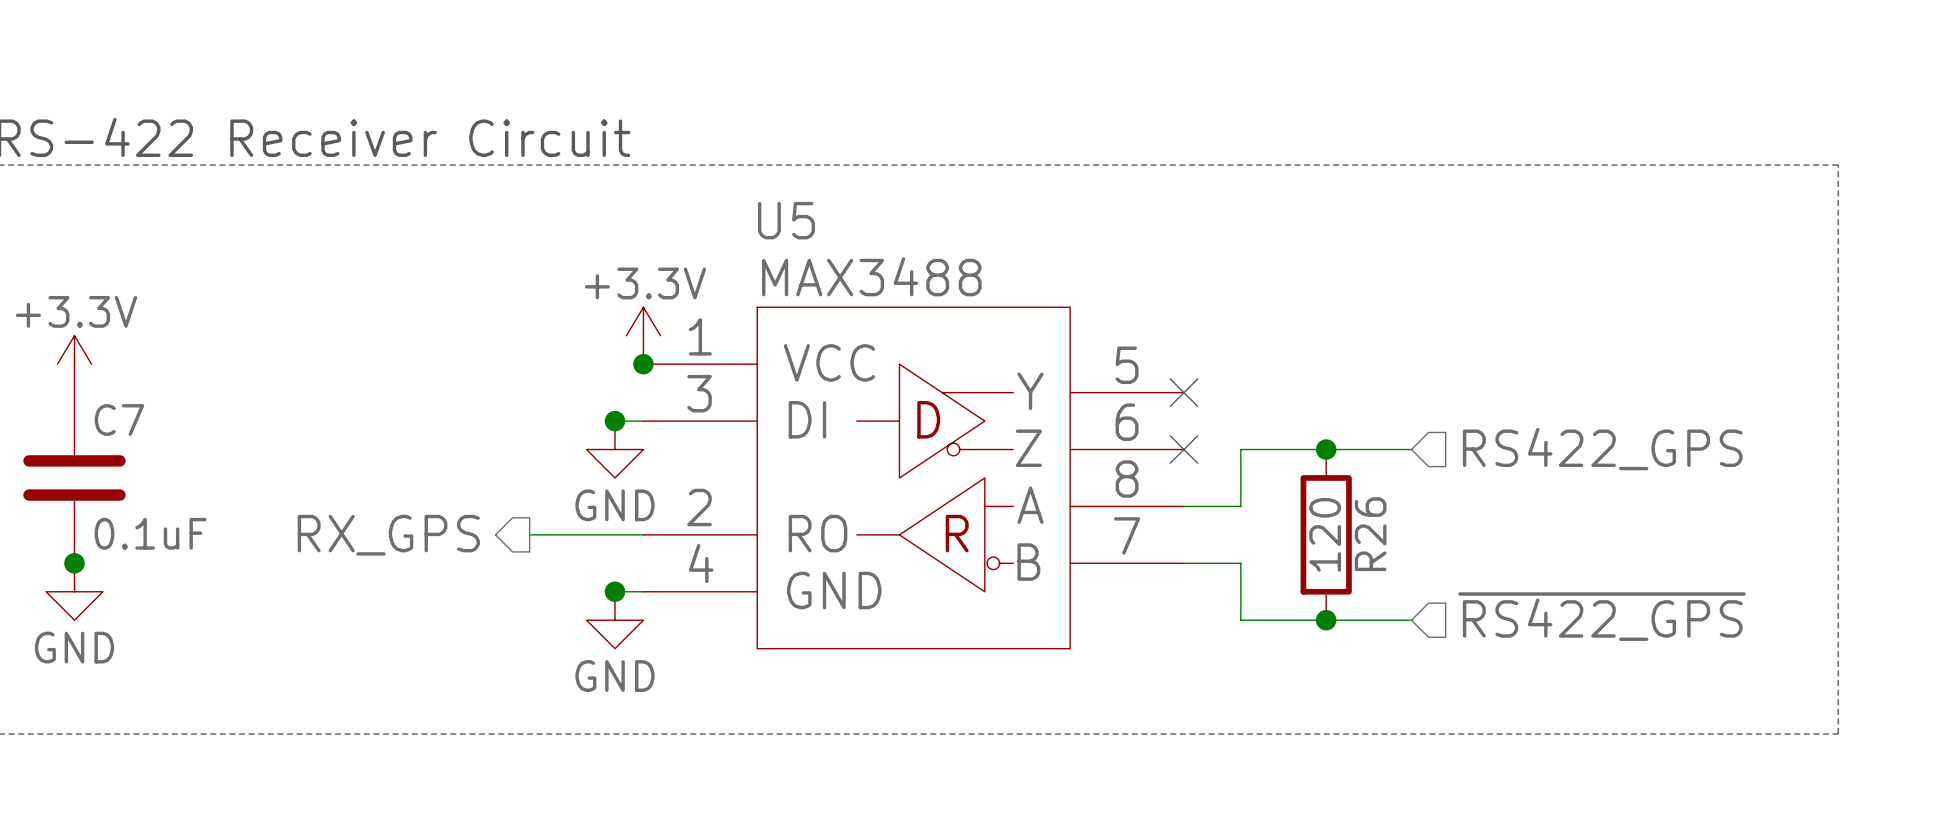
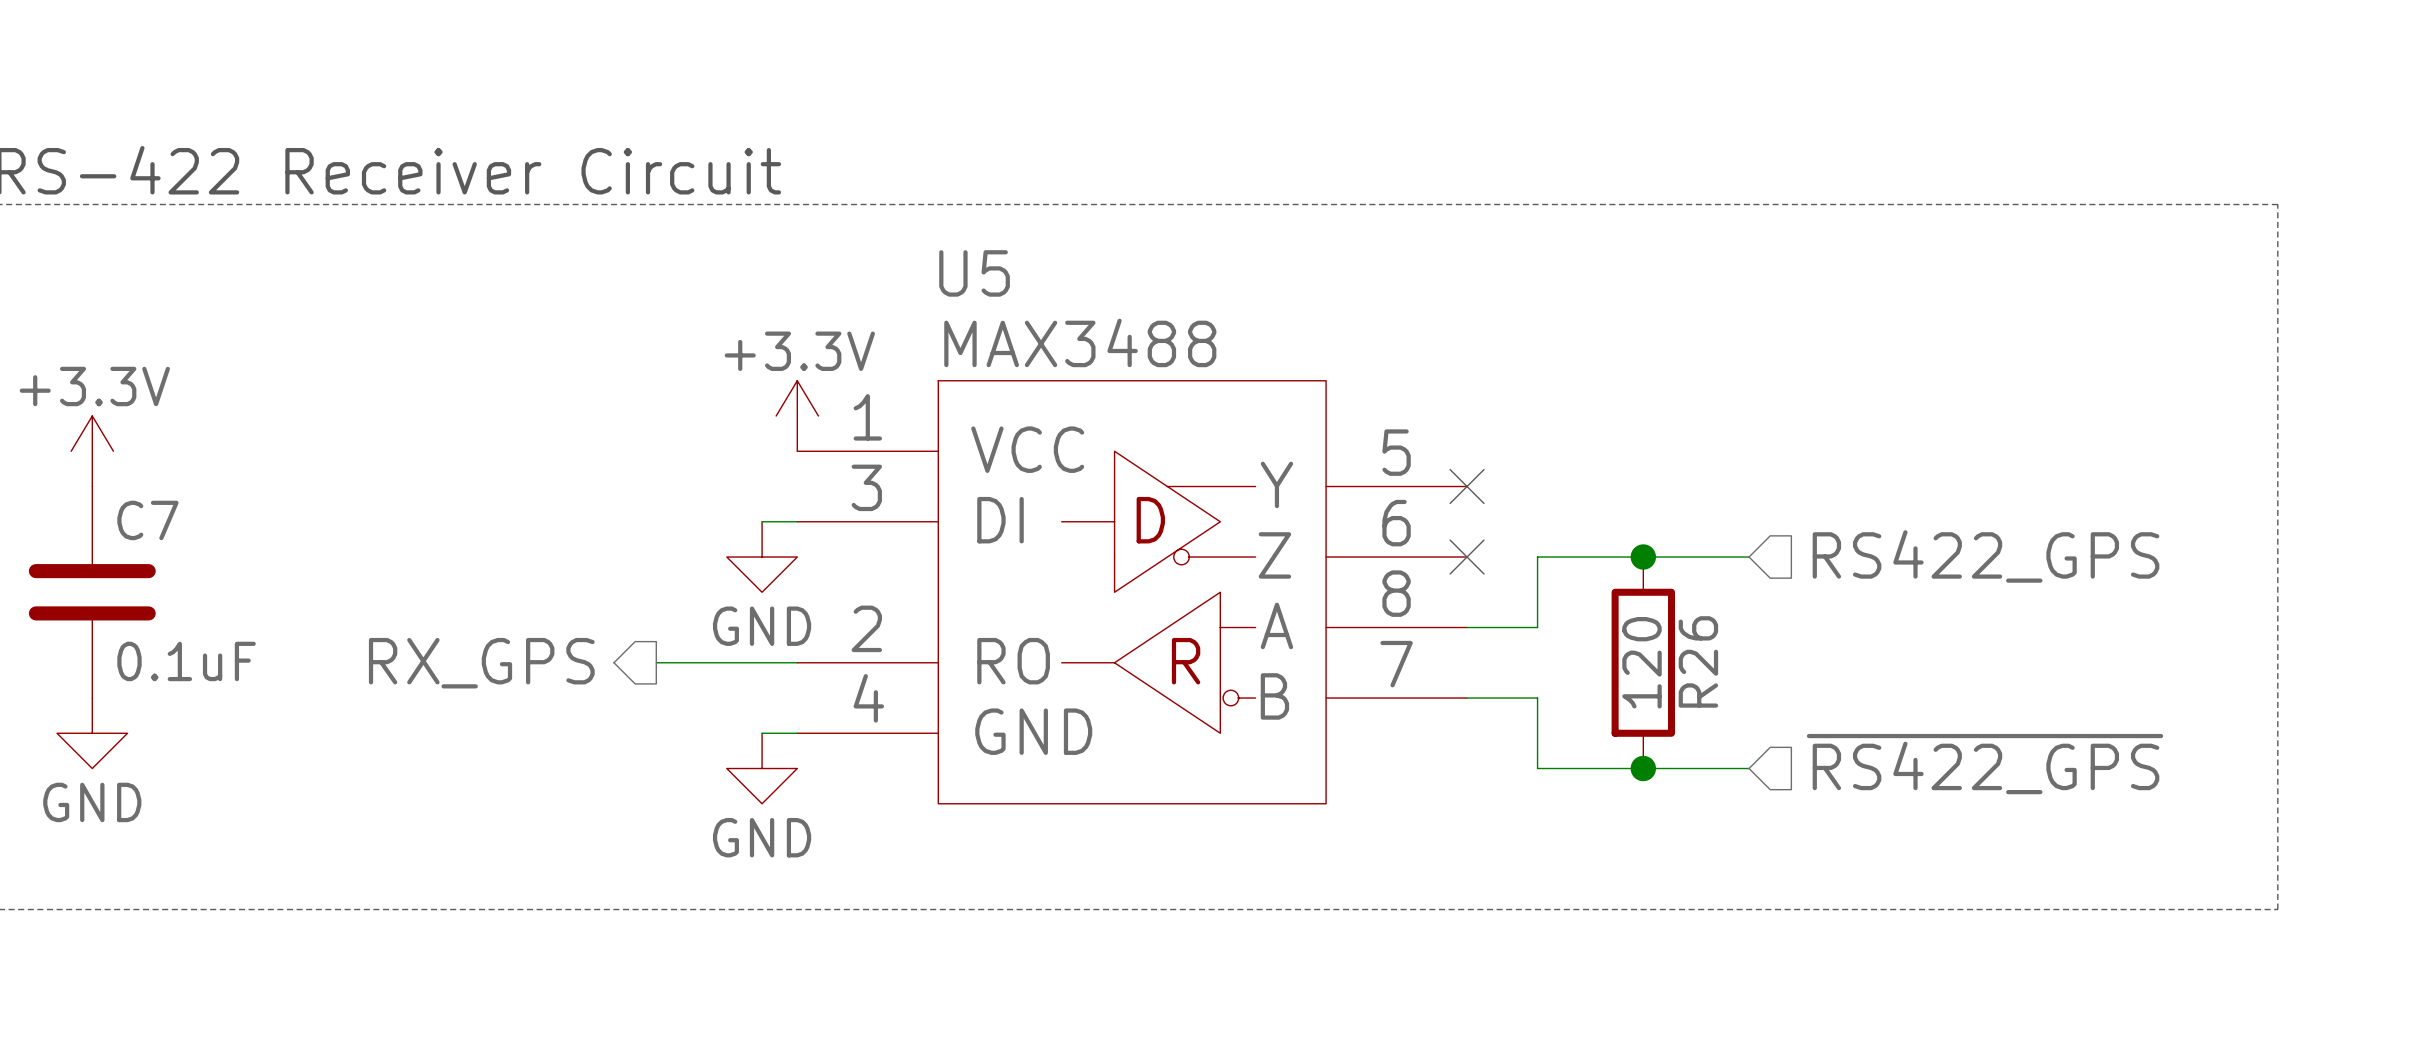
junction: (643, 364) -> none
junction: (615, 421) -> none
junction: (74, 563) -> none
junction: (615, 591) -> none

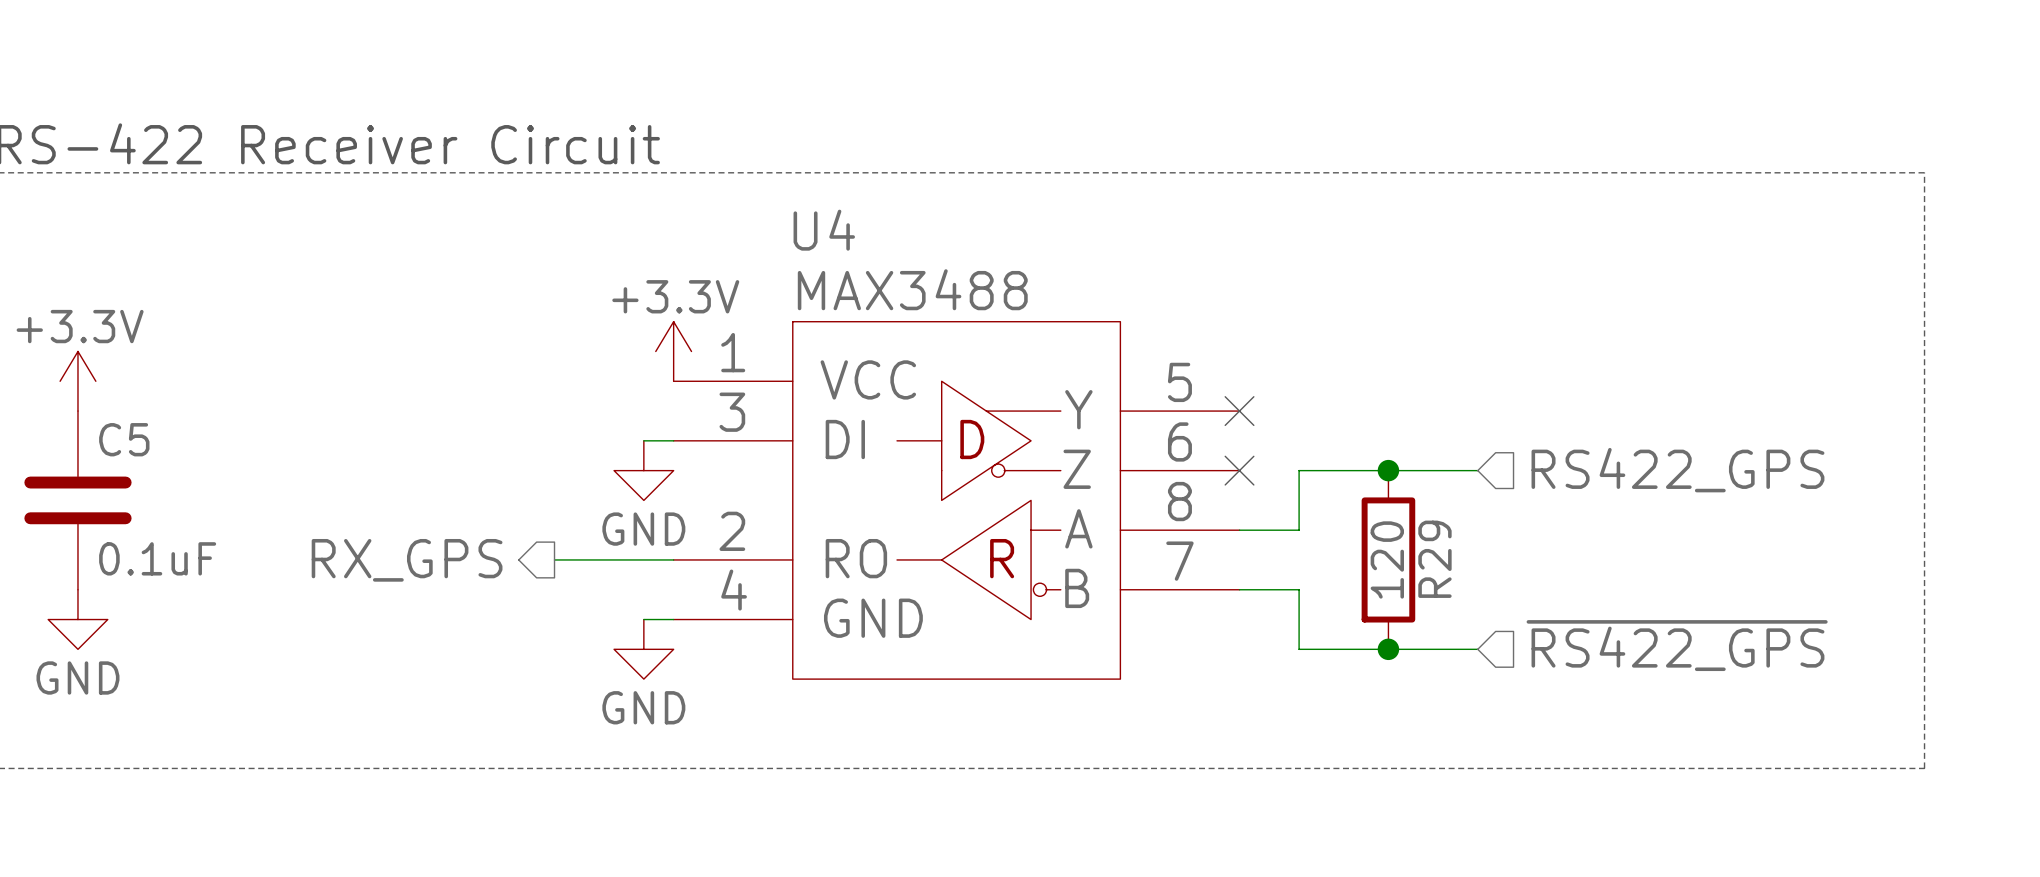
U5 name: U5 (974, 273) -> U4 (824, 230)
C7 name: C7 (147, 520) -> C5 (124, 439)
R26 name: R26 (1698, 661) -> R29 (1434, 559)

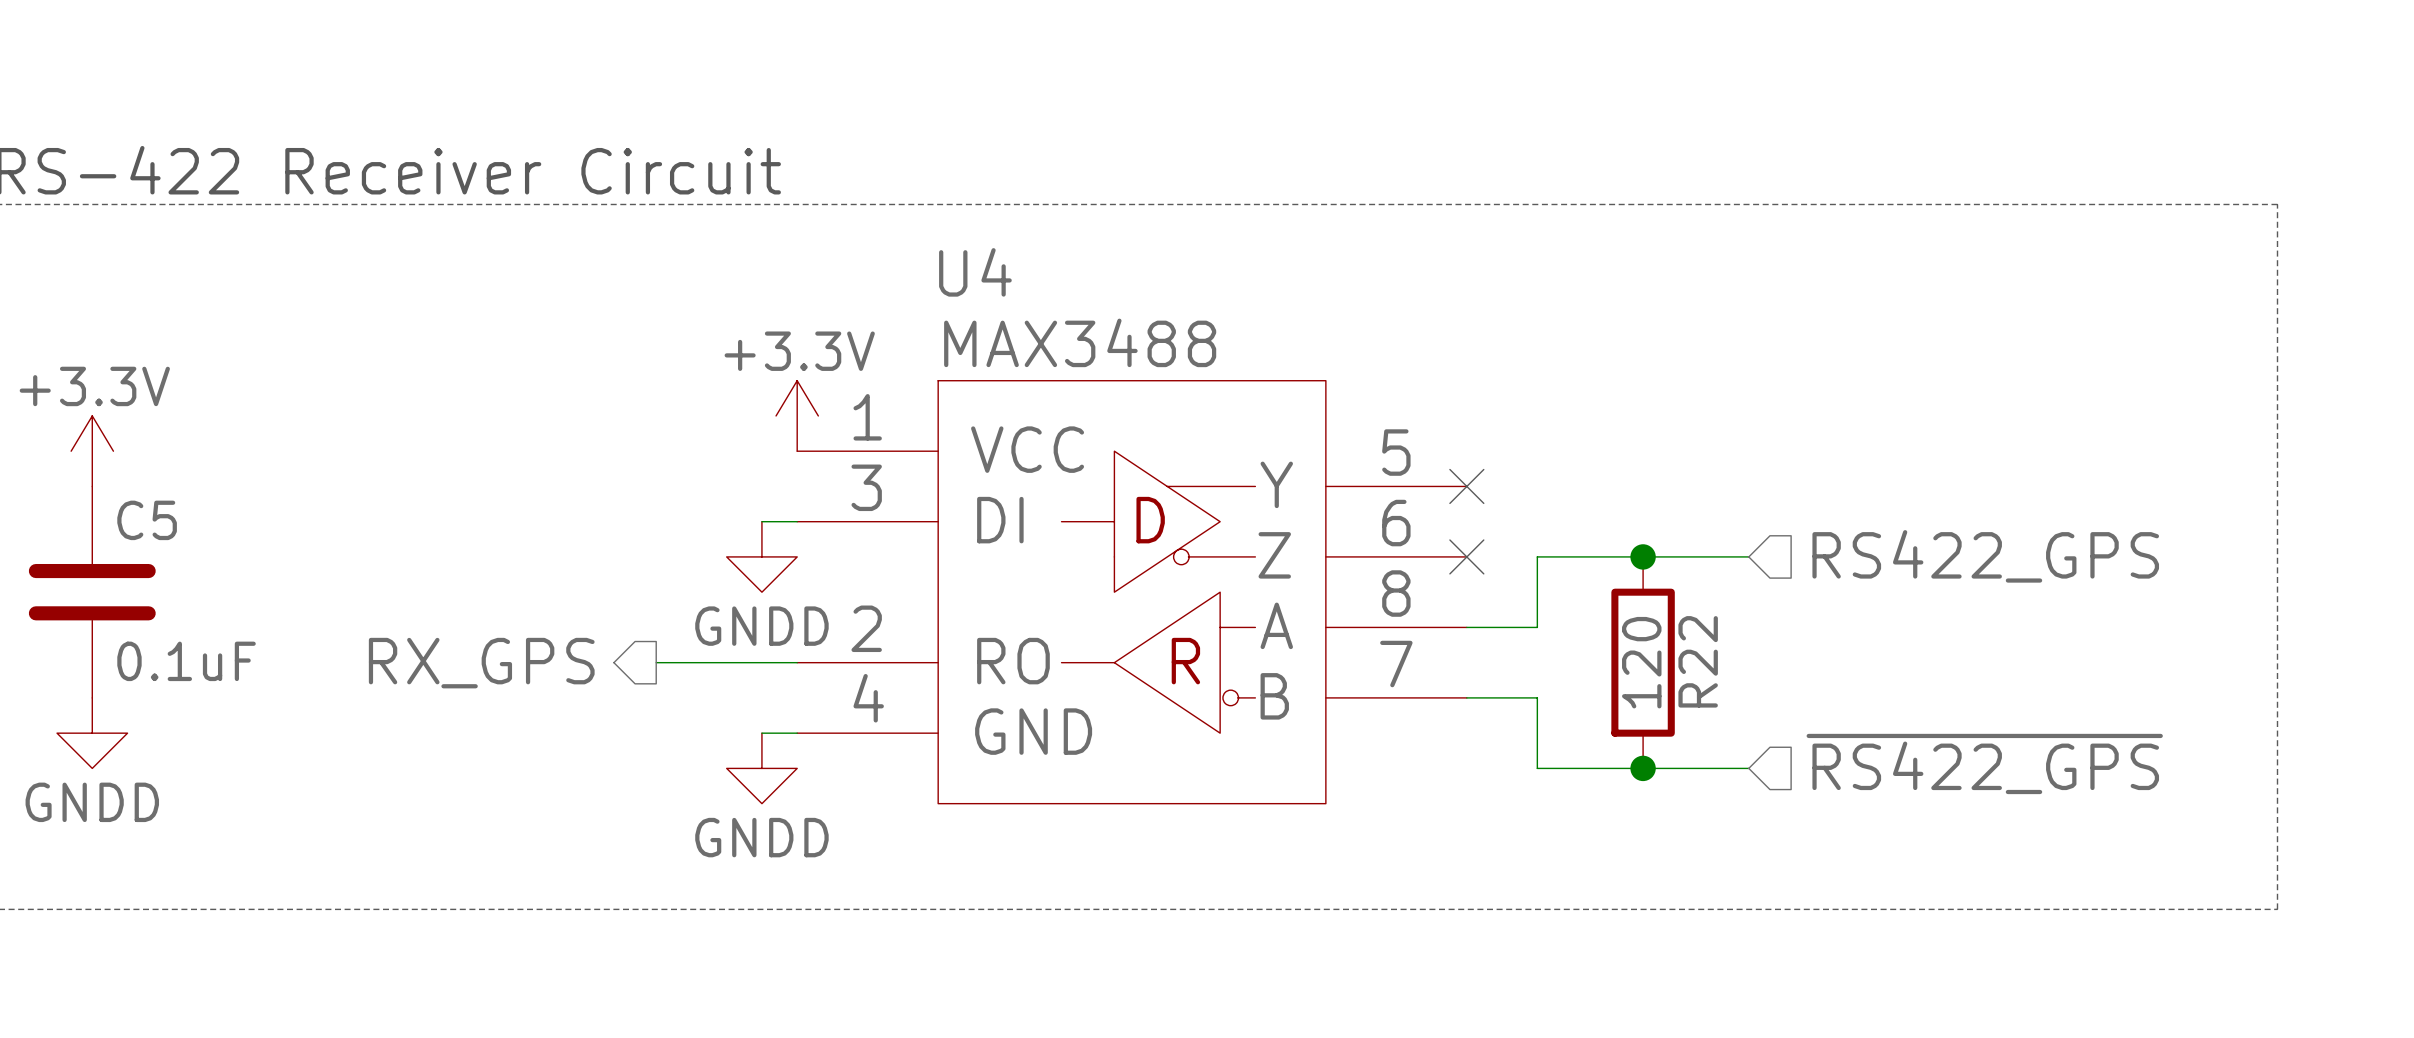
power symbol: GND (643, 470) -> GNDD (761, 556)
R29 name: R29 (1434, 559) -> R22 (1698, 661)
power symbol: GND (77, 619) -> GNDD (92, 733)
power symbol: GND (643, 649) -> GNDD (761, 768)

